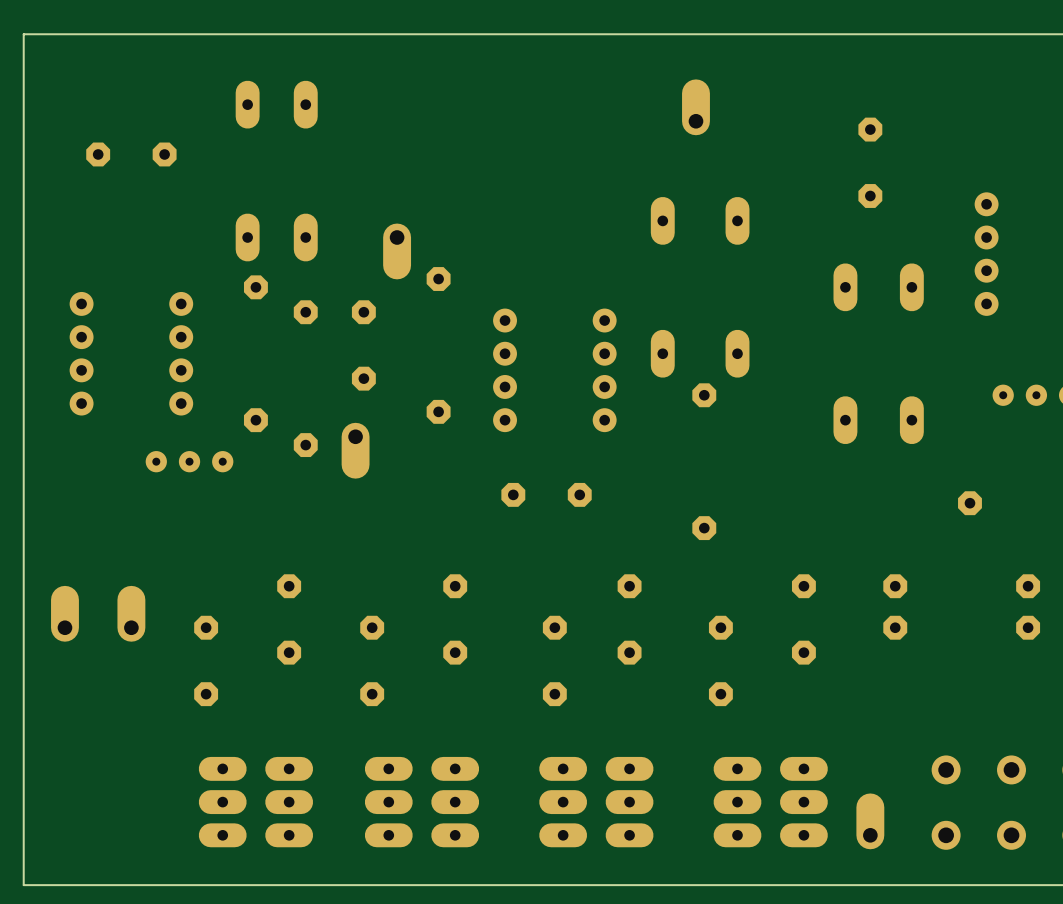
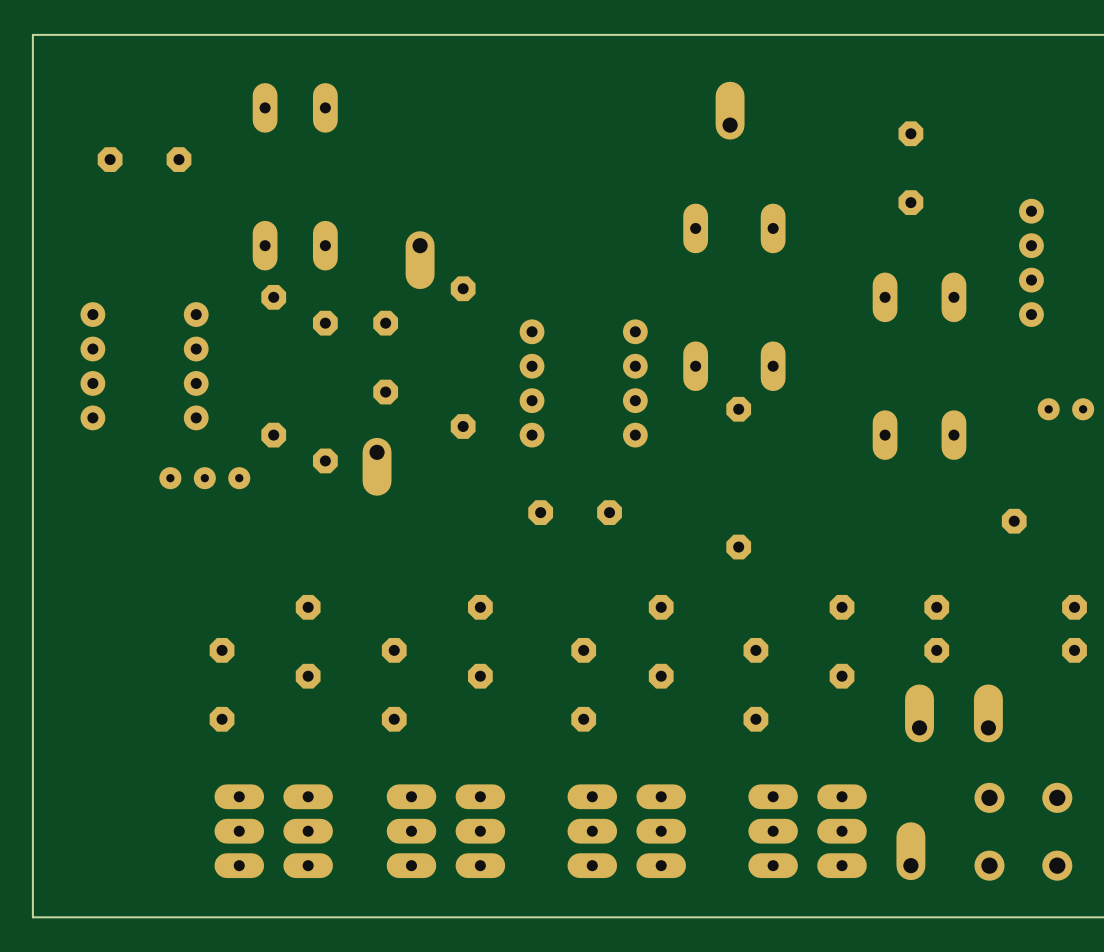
part: (64, 613) -> none
part: (131, 613) -> none
part: none -> (919, 713)
part: none -> (988, 713)

